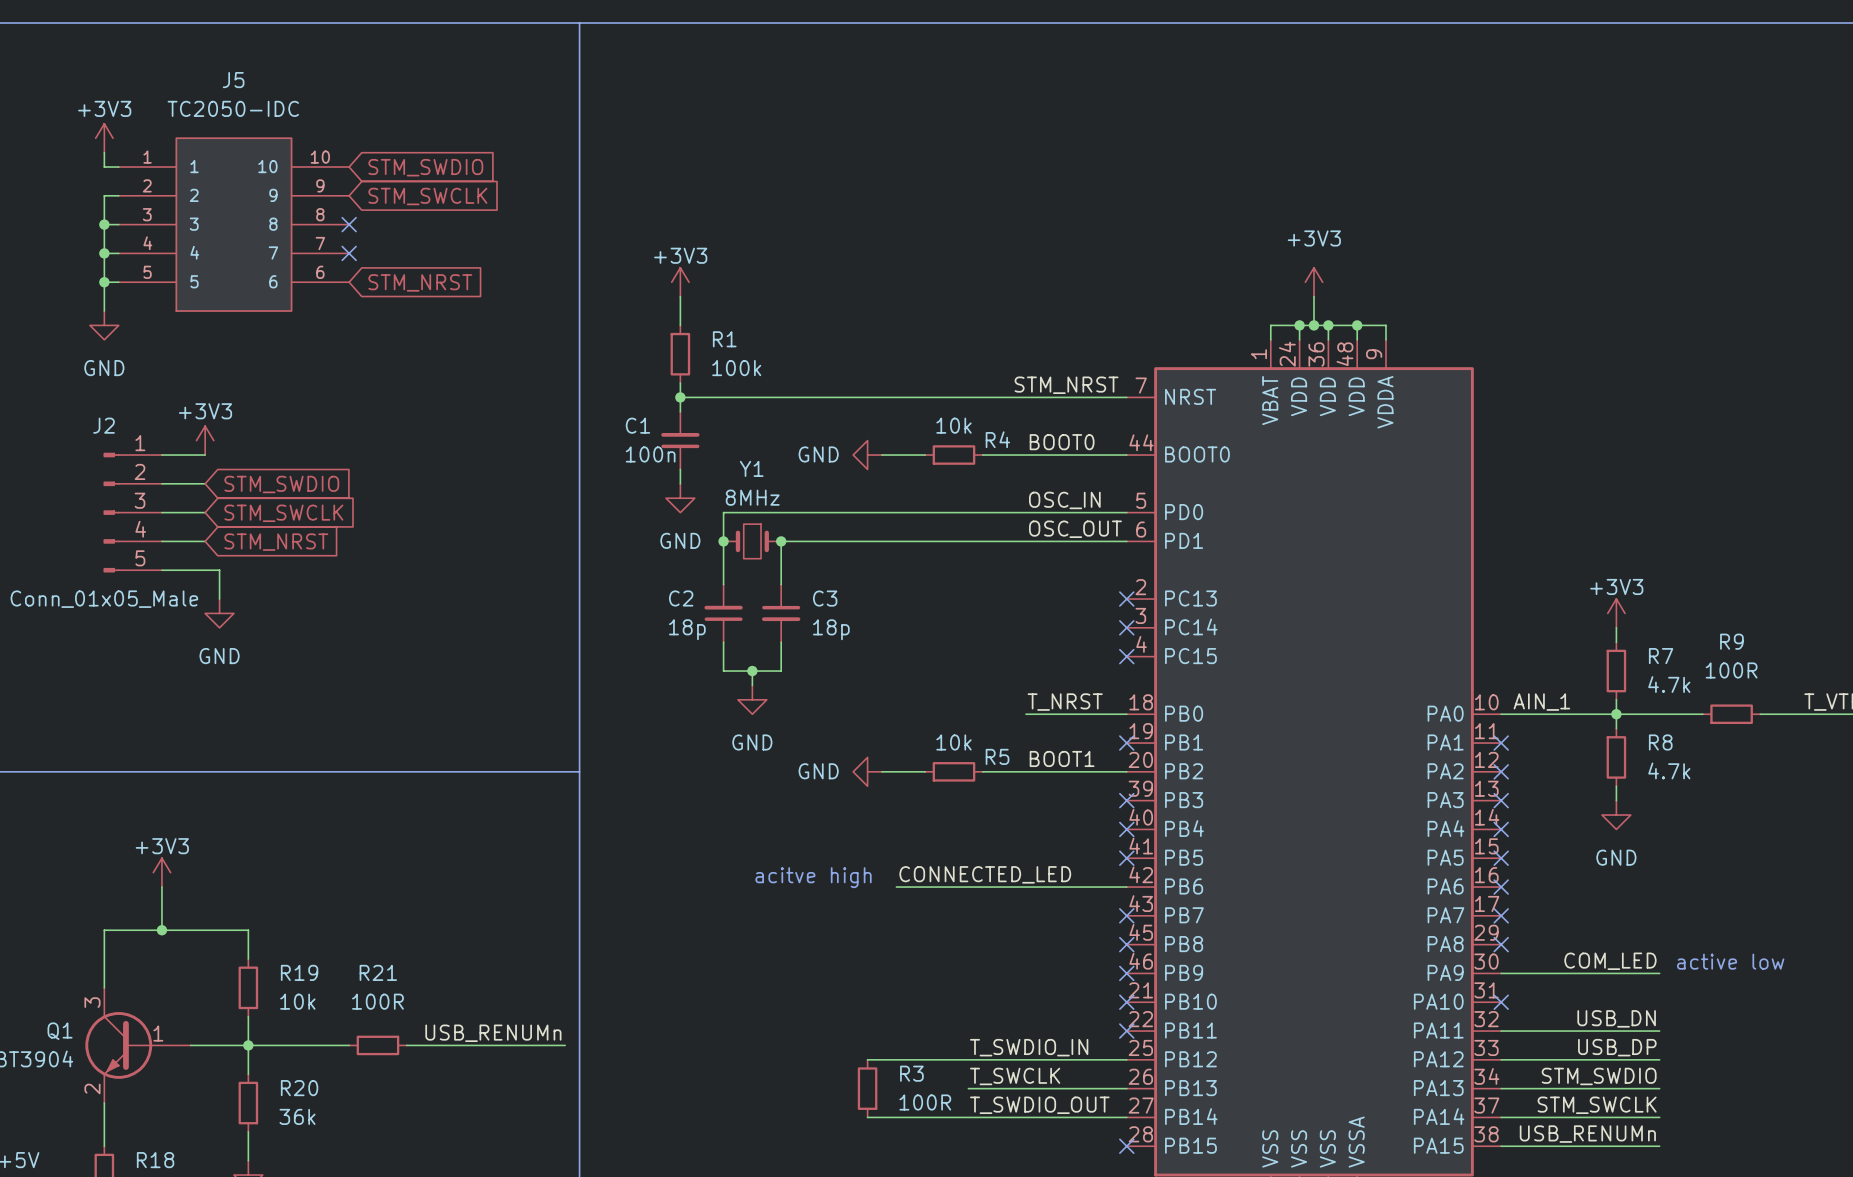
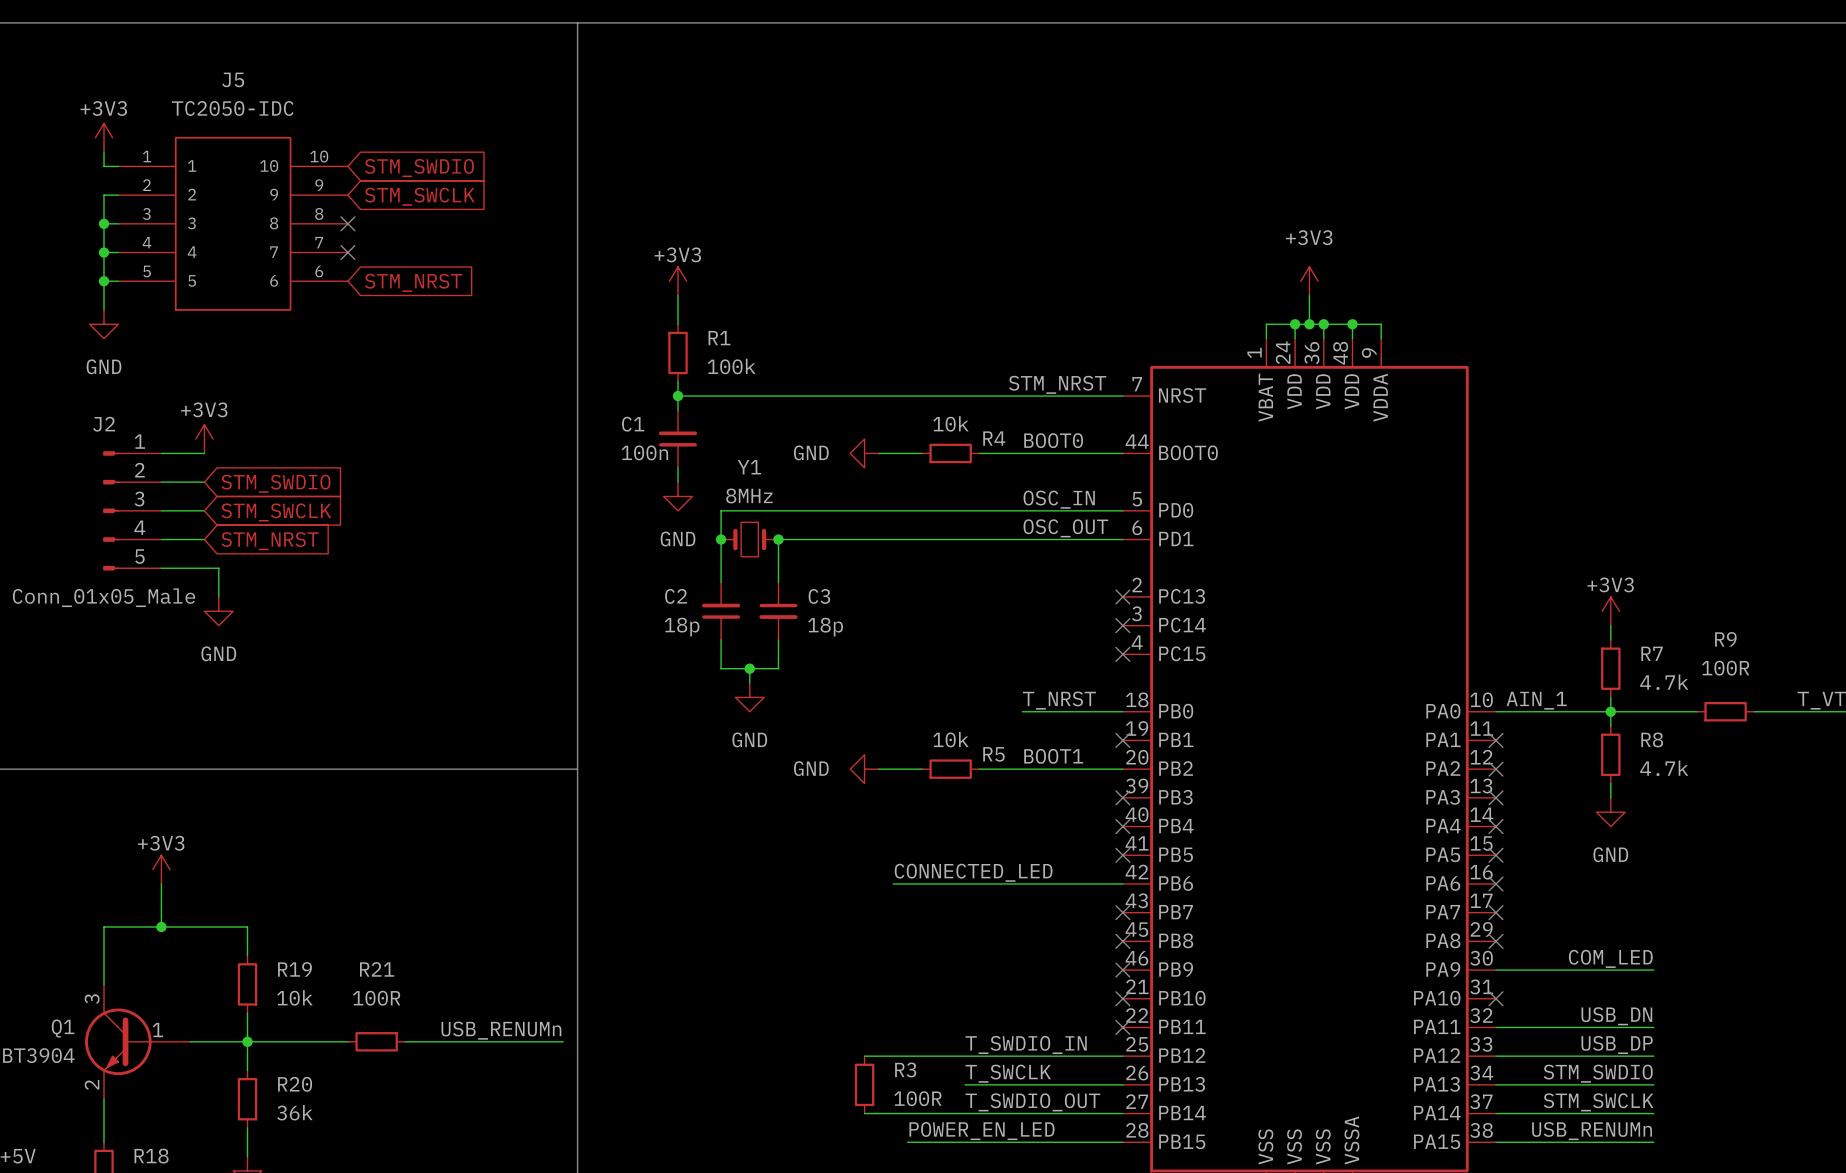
text: acitve high (813, 877) -> none
text: active low (1730, 961) -> none
label: none -> POWER_EN_LED (981, 1131)
wire: none -> (907, 1142) (1122, 1142)
no-connect mark: (1126, 1146) -> none

